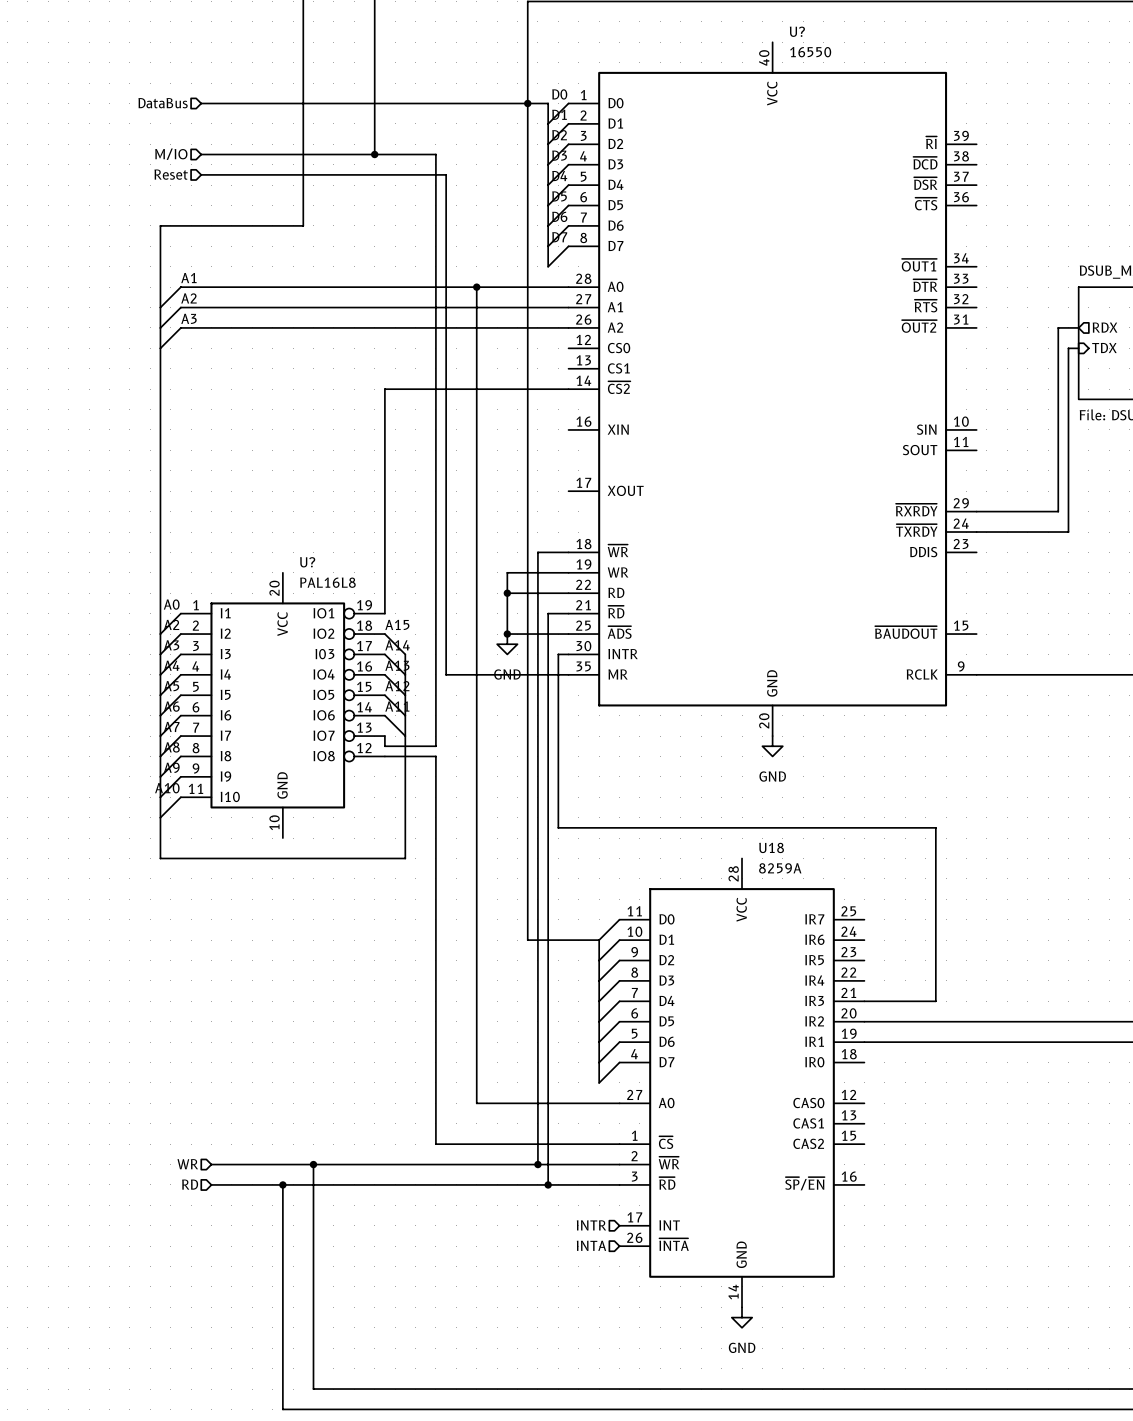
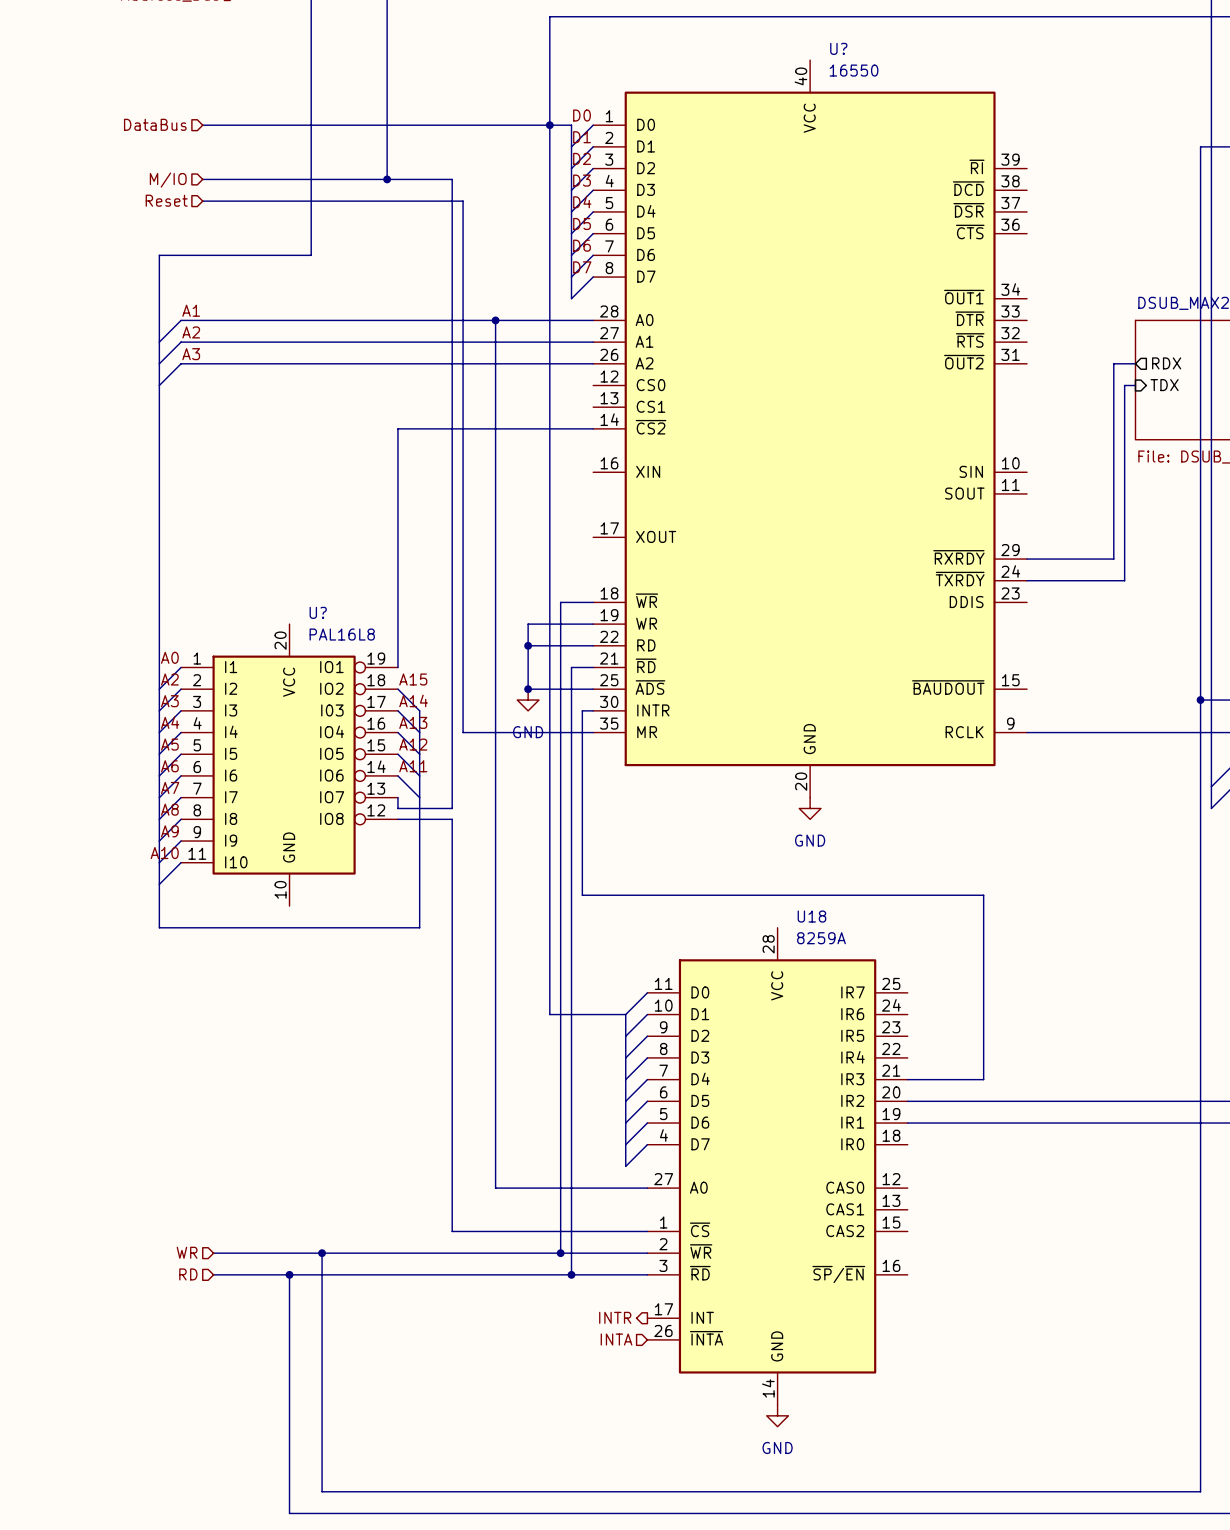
hierarchical label shape: input (591, 1225) -> output (615, 1317)

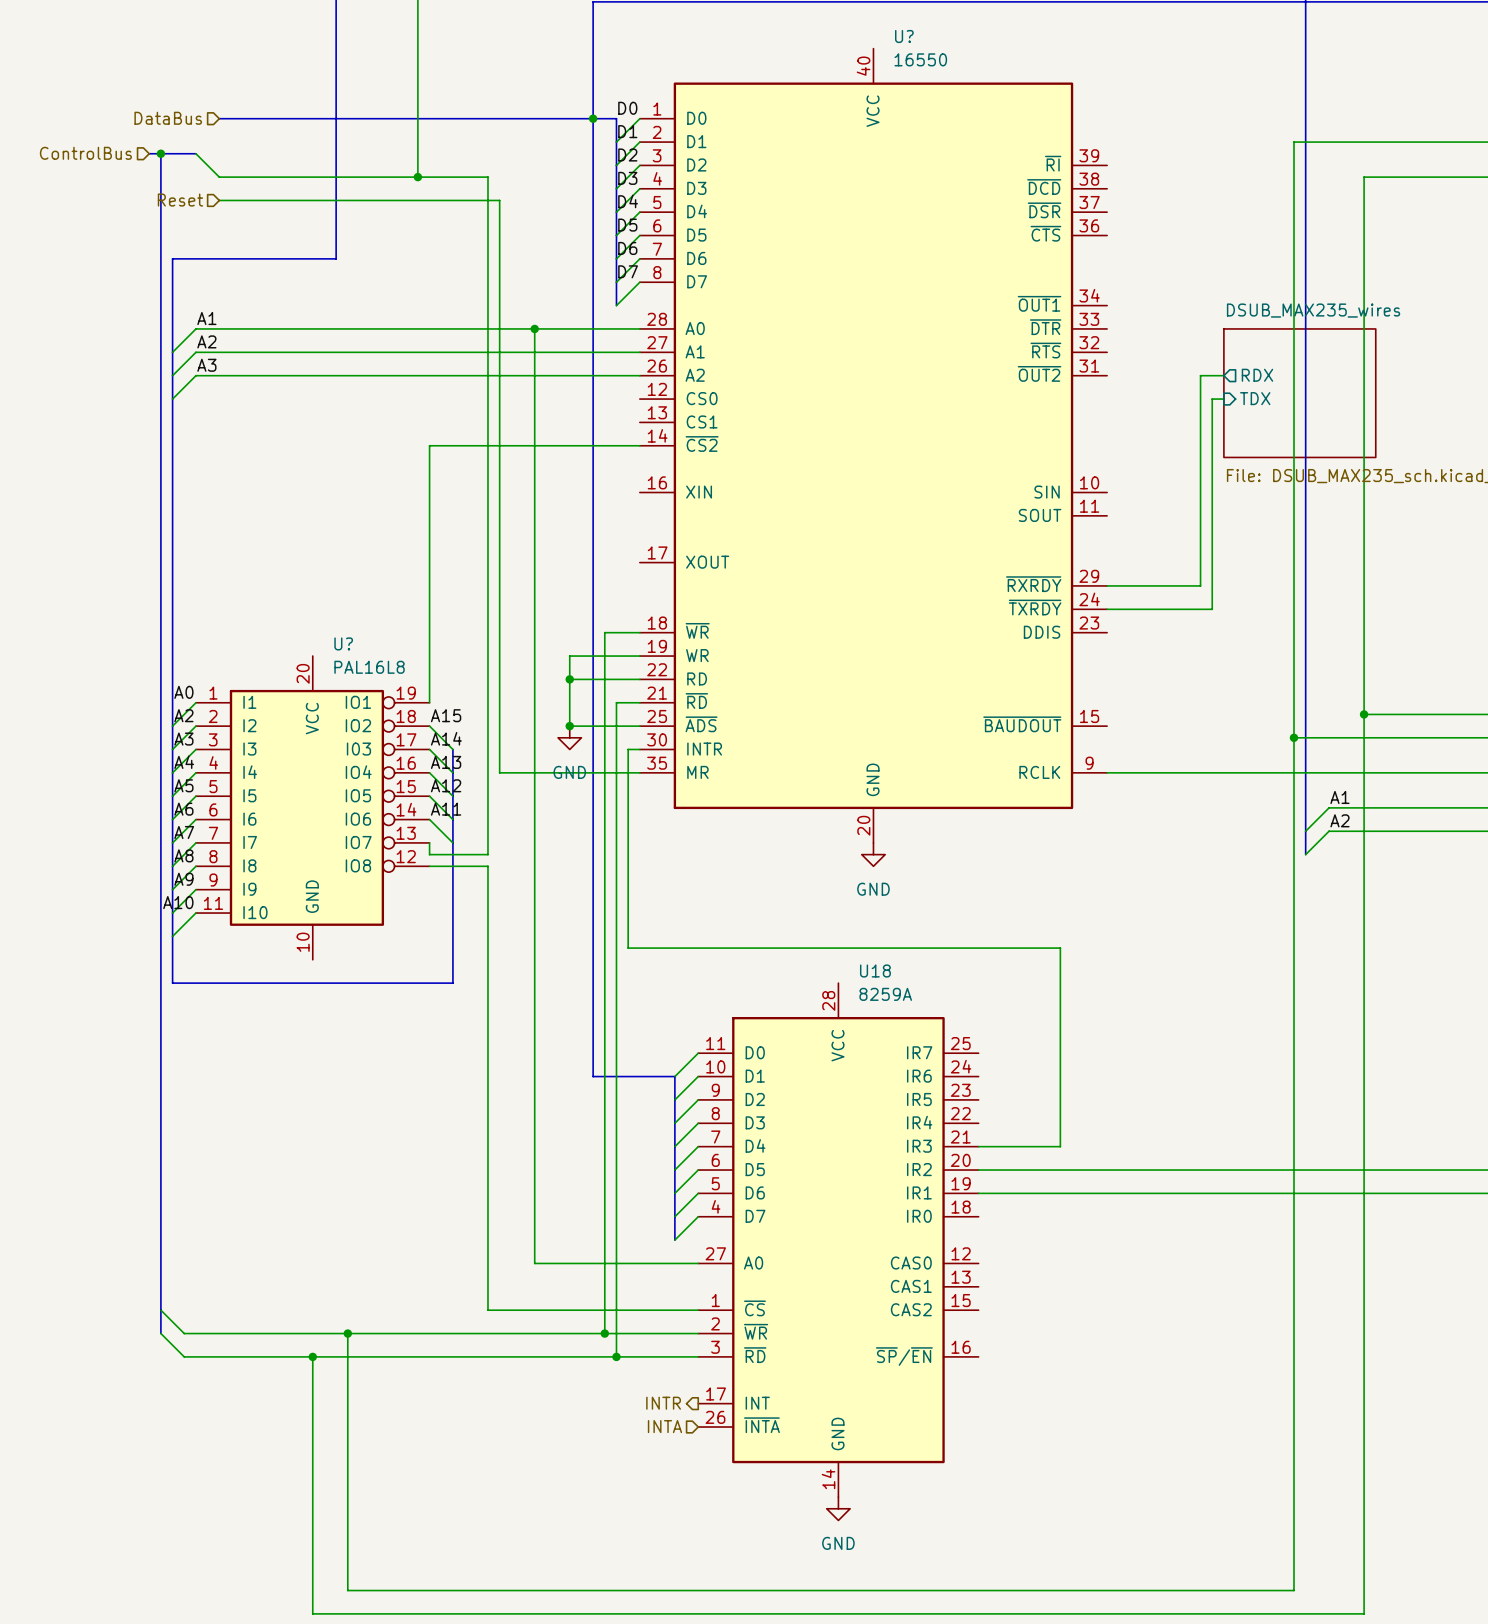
hierarchical label: none -> ControlBus (85, 153)
bus: none -> (149, 153) (195, 153)
bus: none -> (160, 153) (160, 1333)
junction: none -> (160, 153)
wire: none -> (195, 153) (219, 177)
hierarchical label: M/IO (168, 180) -> none
wire: none -> (160, 1310) (184, 1333) (231, 1333)
hierarchical label: WR (187, 1252) -> none
wire: none -> (160, 1333) (184, 1356) (231, 1356)
hierarchical label: RD (188, 1274) -> none

